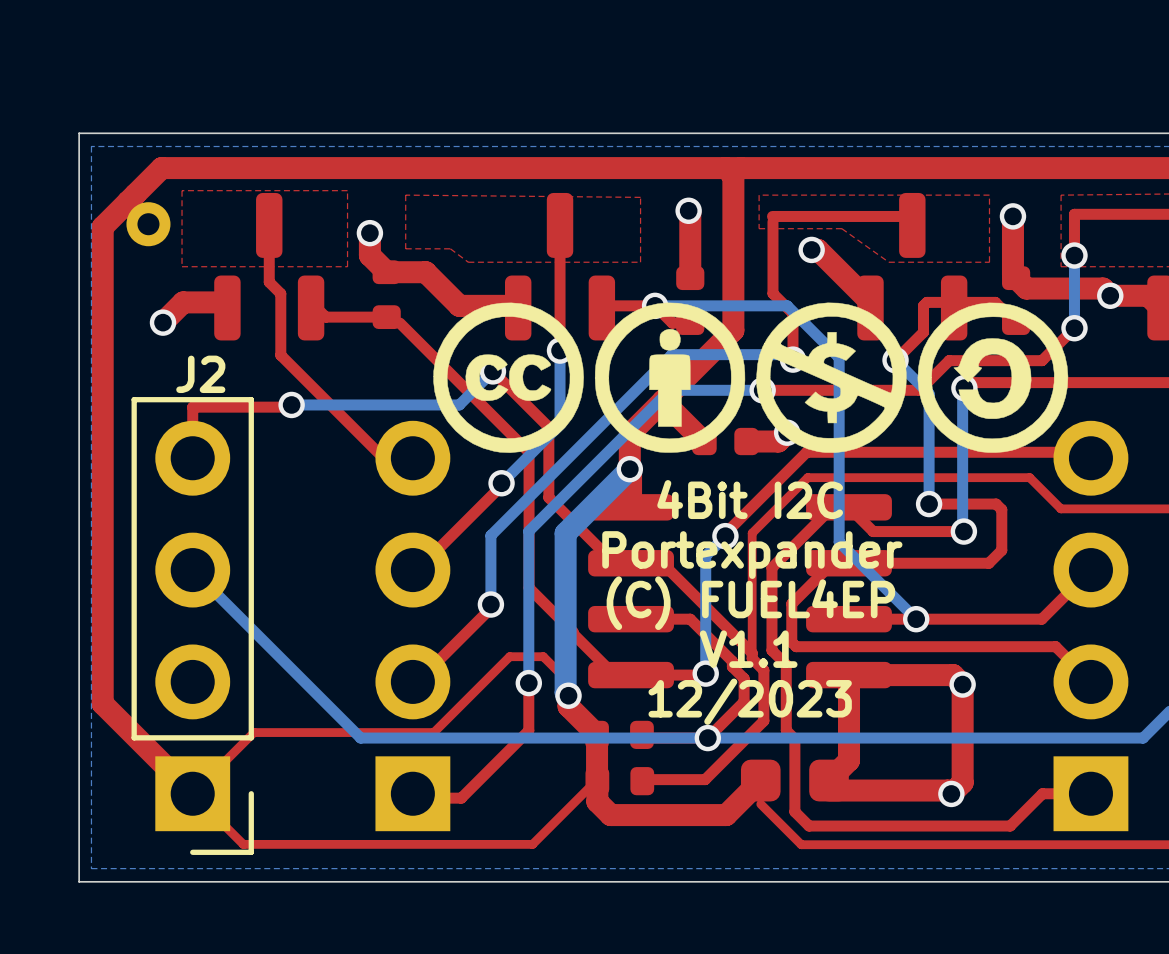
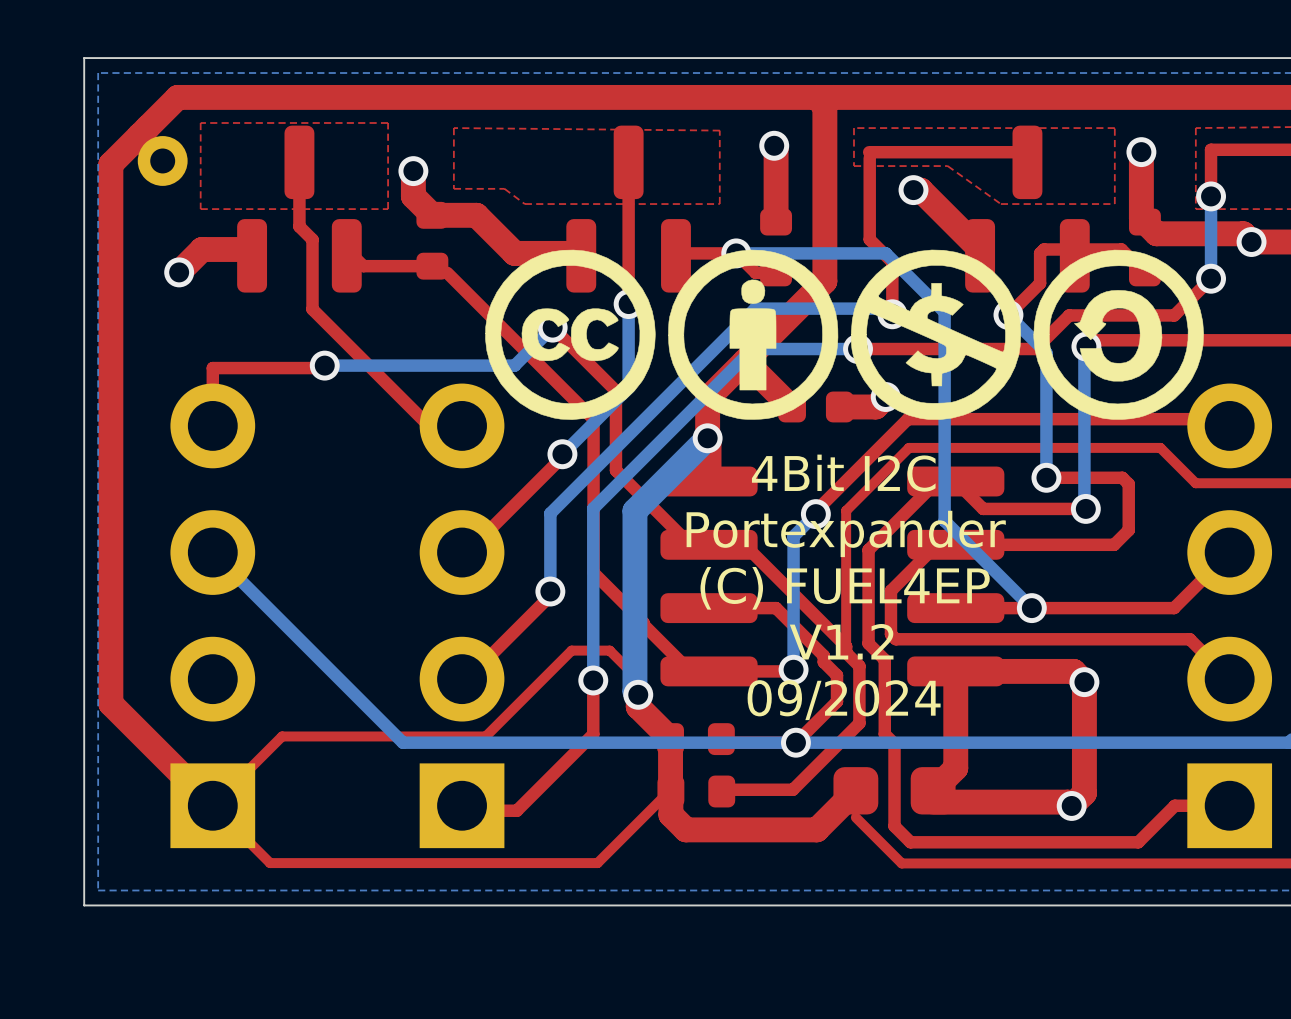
J2 side: bottom (192, 626) -> top (212, 615)
text: V1.1 (748, 649) -> V1.2 (841, 641)
text: 12/2023 (750, 701) -> 09/2024 (844, 700)

